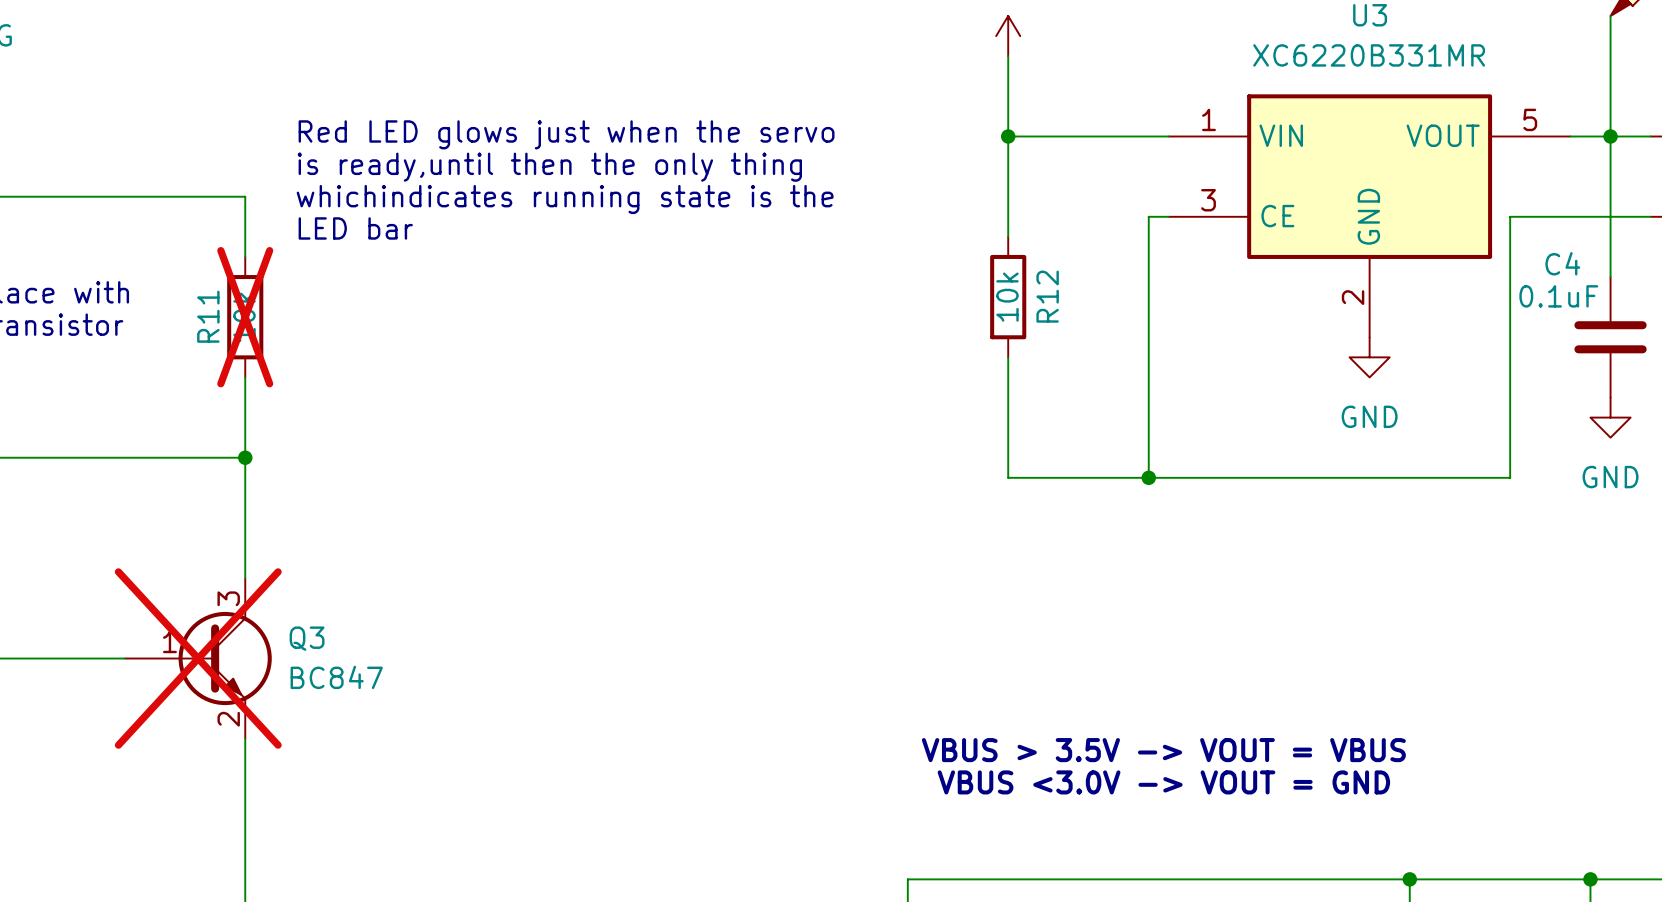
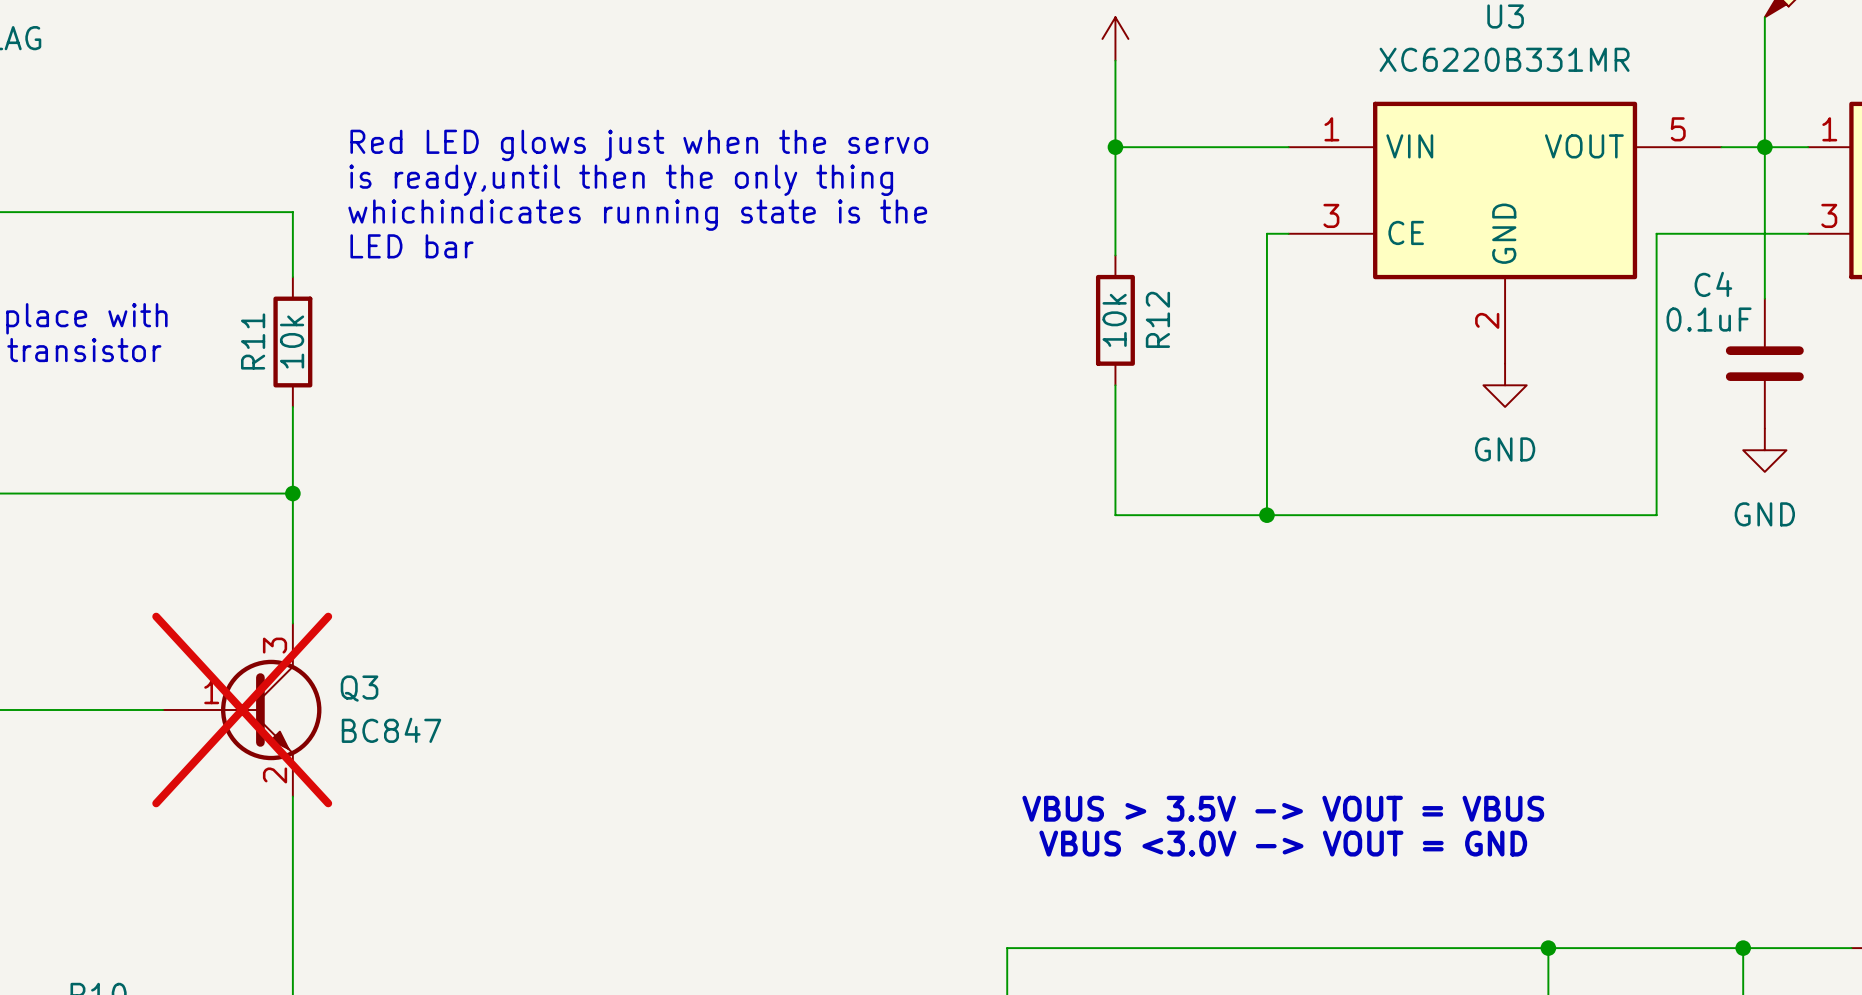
R11 do-not-place cross: (245, 317) -> none

